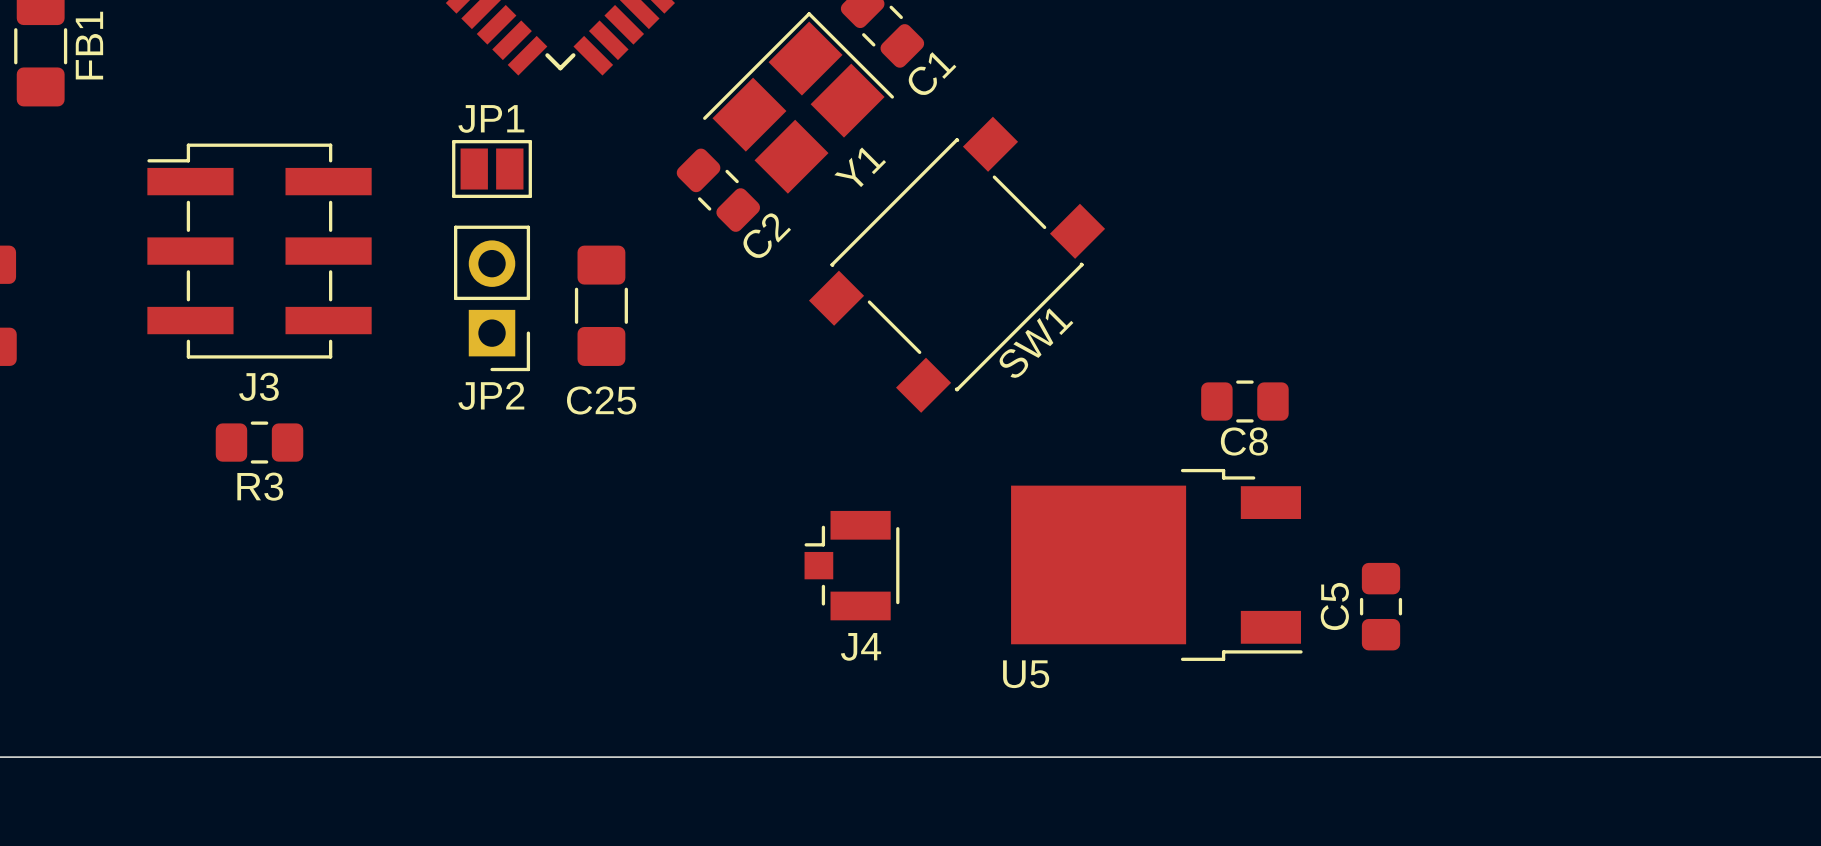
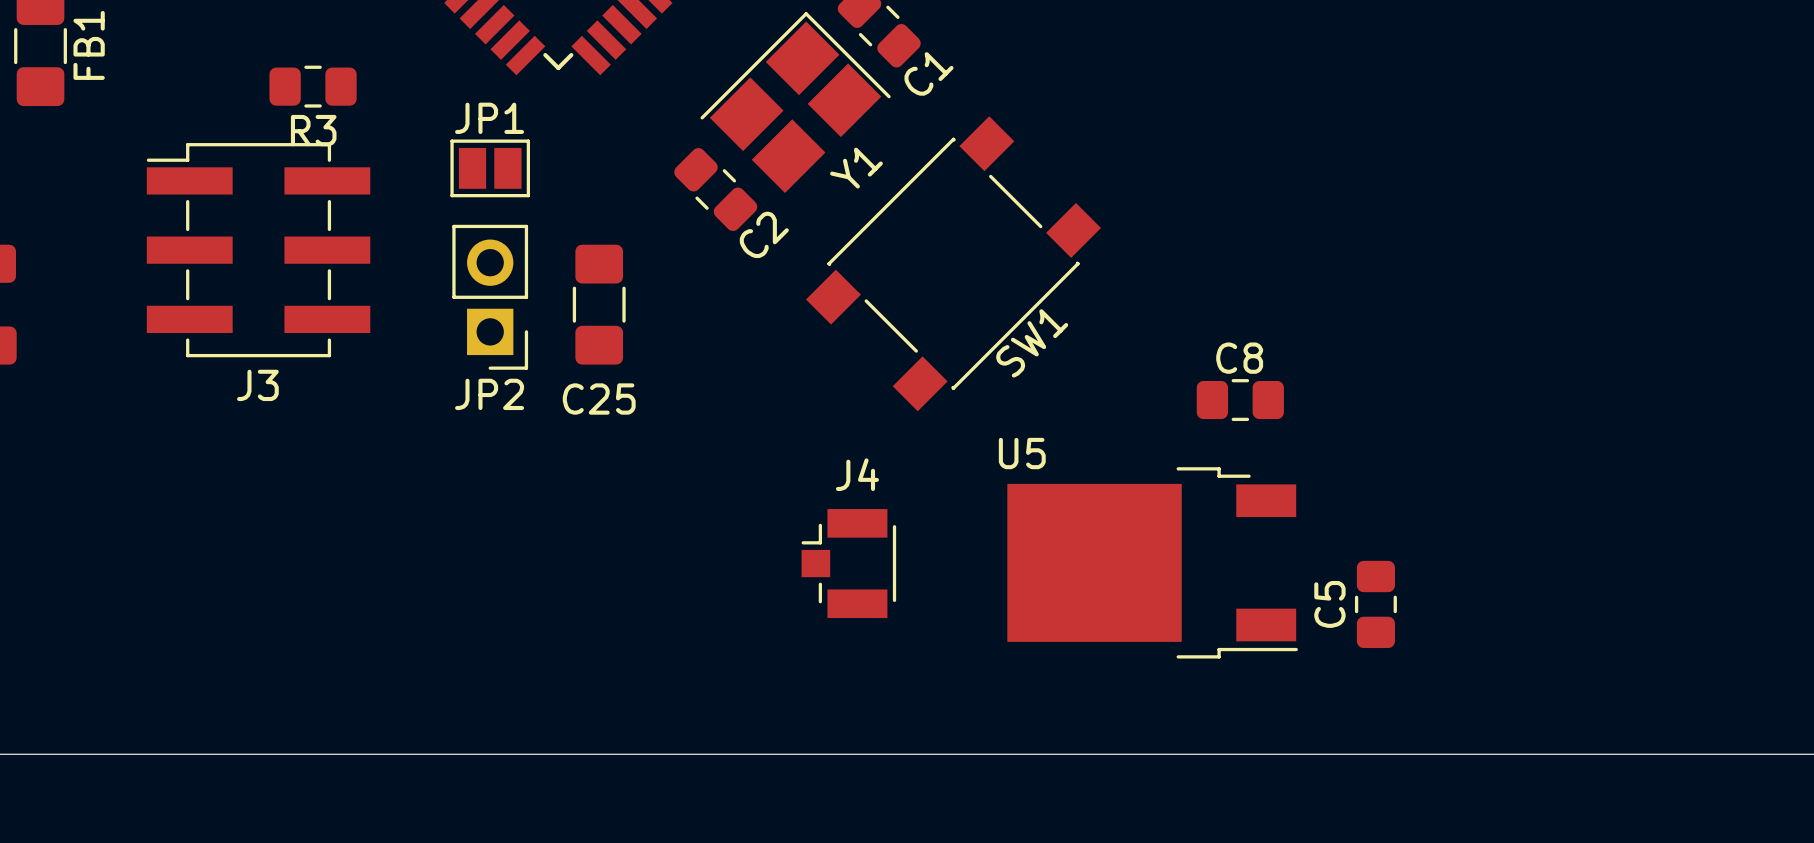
C8 name position: C8 (1244, 441) -> C8 (1239, 358)
R3 position: (259, 442) -> (313, 86)
J4 name position: J4 (861, 646) -> J4 (857, 474)
U5 name position: U5 (1026, 674) -> U5 (1022, 453)

